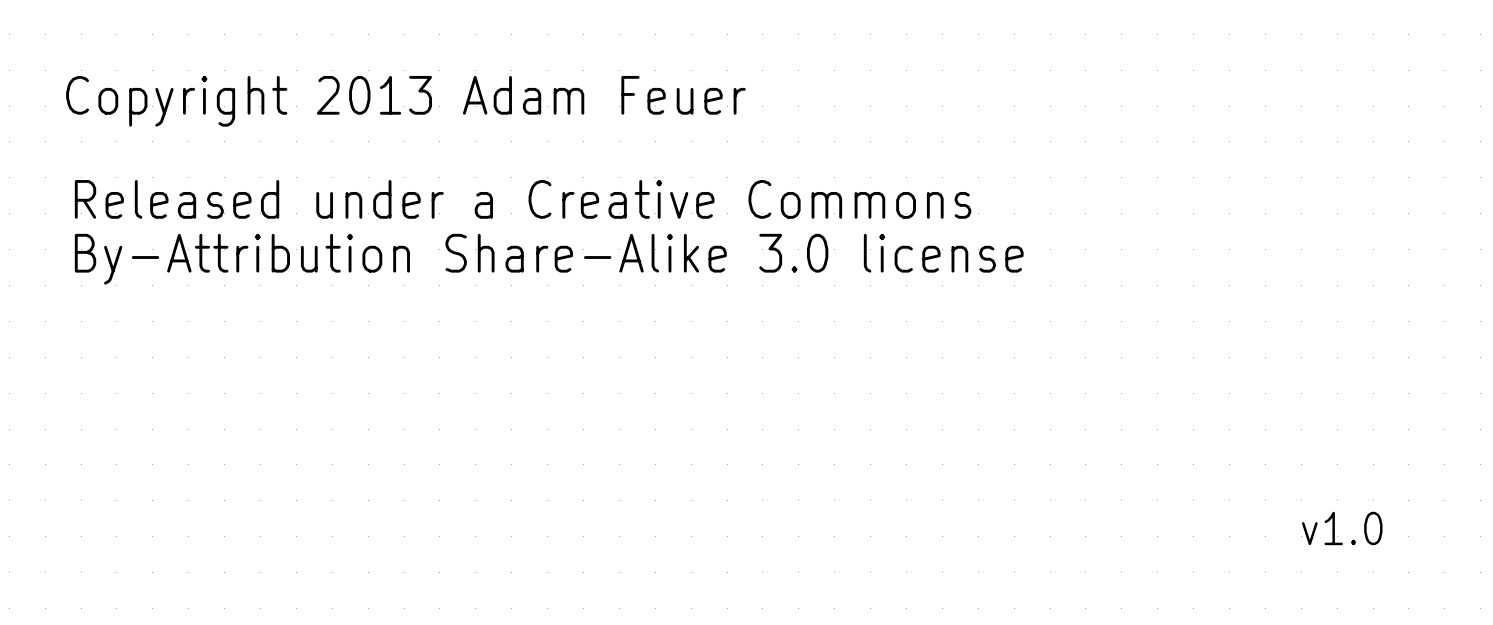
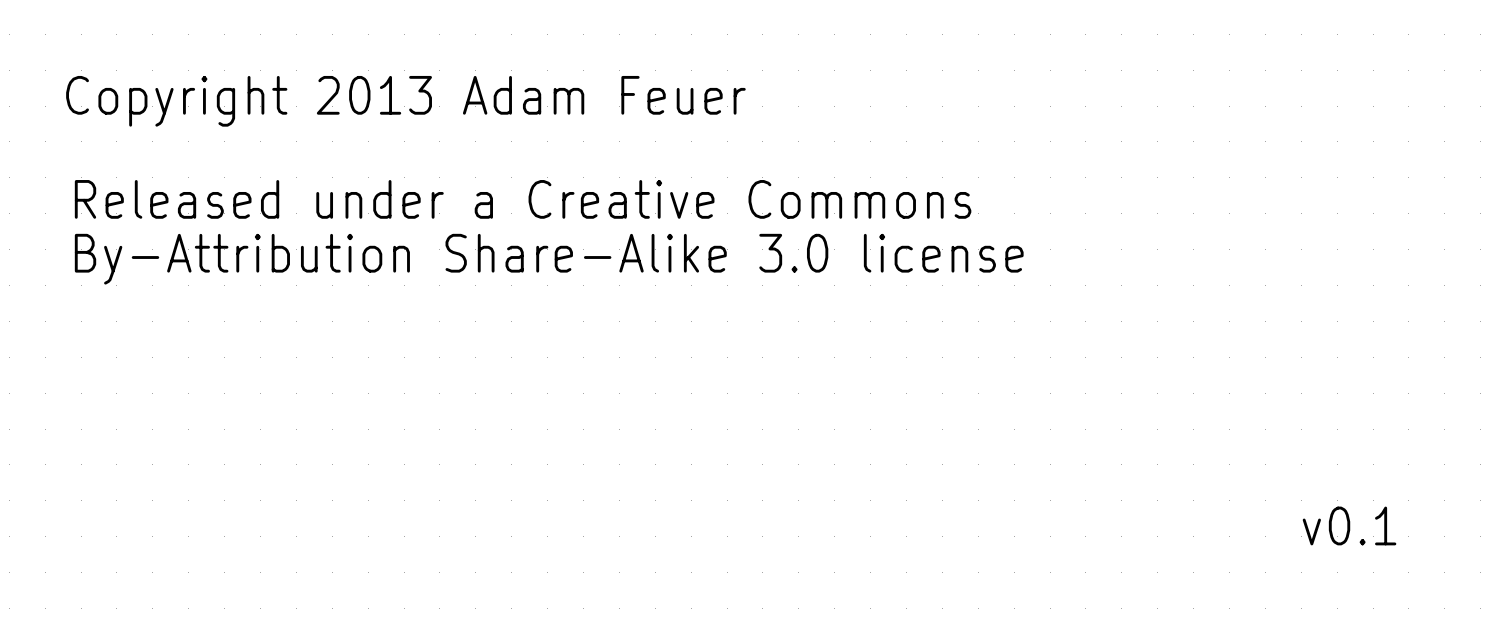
text: v1.0 (1342, 528) -> v0.1 (1349, 525)

